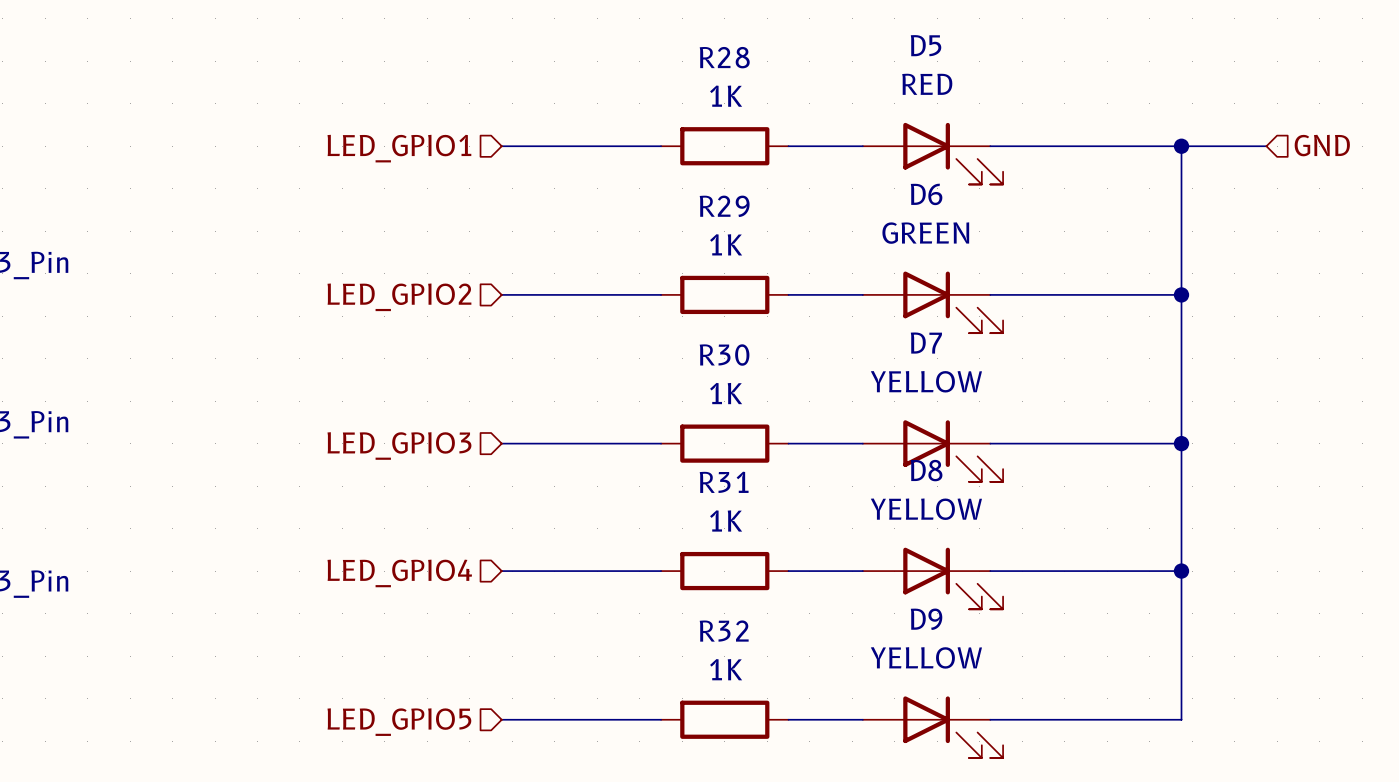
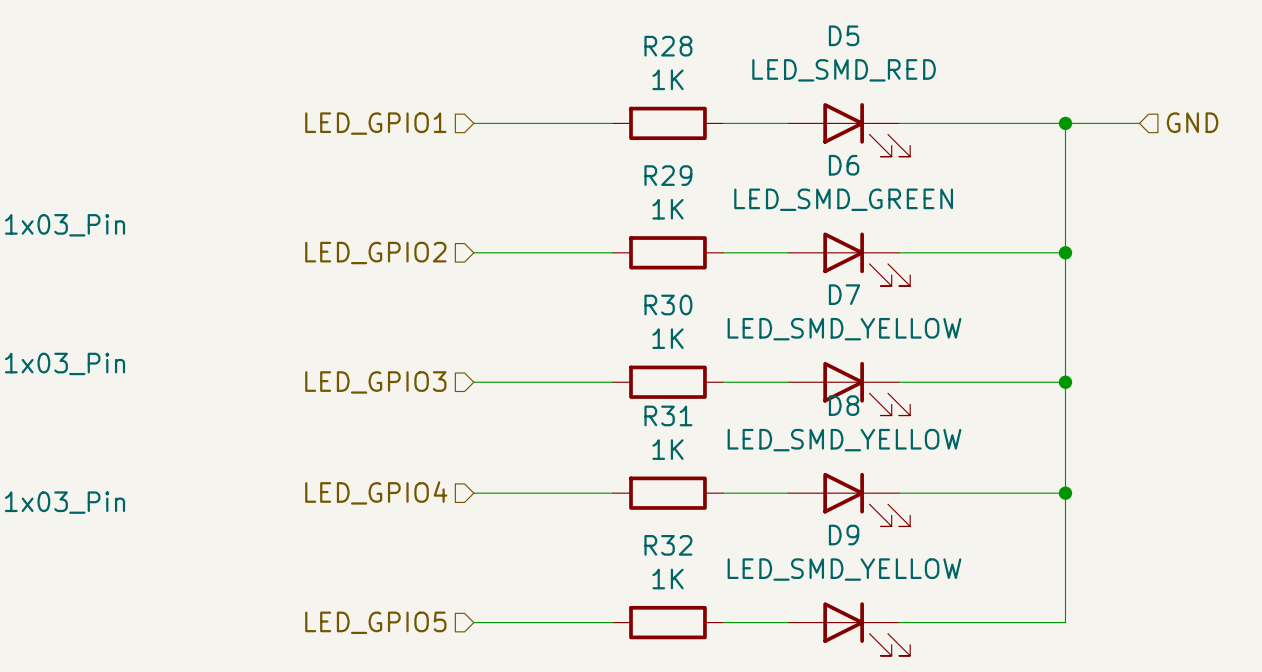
D5 value: RED (927, 84) -> LED_SMD_RED (844, 70)
D6 value: GREEN (925, 233) -> LED_SMD_GREEN (843, 199)
D7 value: YELLOW (926, 381) -> LED_SMD_YELLOW (844, 329)
D8 value: YELLOW (926, 509) -> LED_SMD_YELLOW (844, 440)
D9 value: YELLOW (926, 657) -> LED_SMD_YELLOW (844, 569)

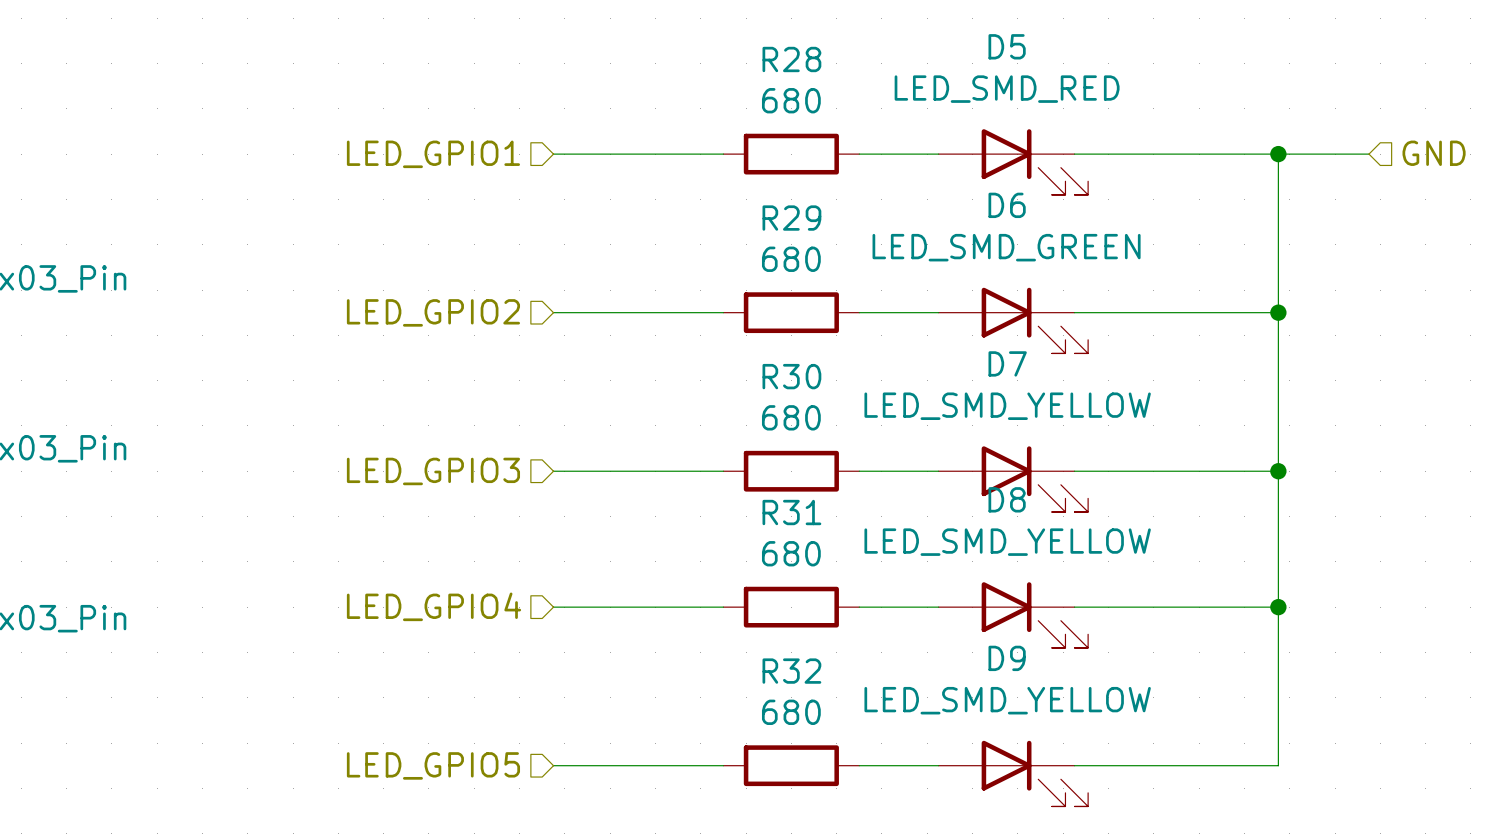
R28 value: 1K (667, 79) -> 680 (791, 100)
R29 value: 1K (667, 209) -> 680 (791, 259)
R30 value: 1K (667, 338) -> 680 (791, 417)
R31 value: 1K (667, 449) -> 680 (791, 553)
R32 value: 1K (667, 579) -> 680 (791, 712)

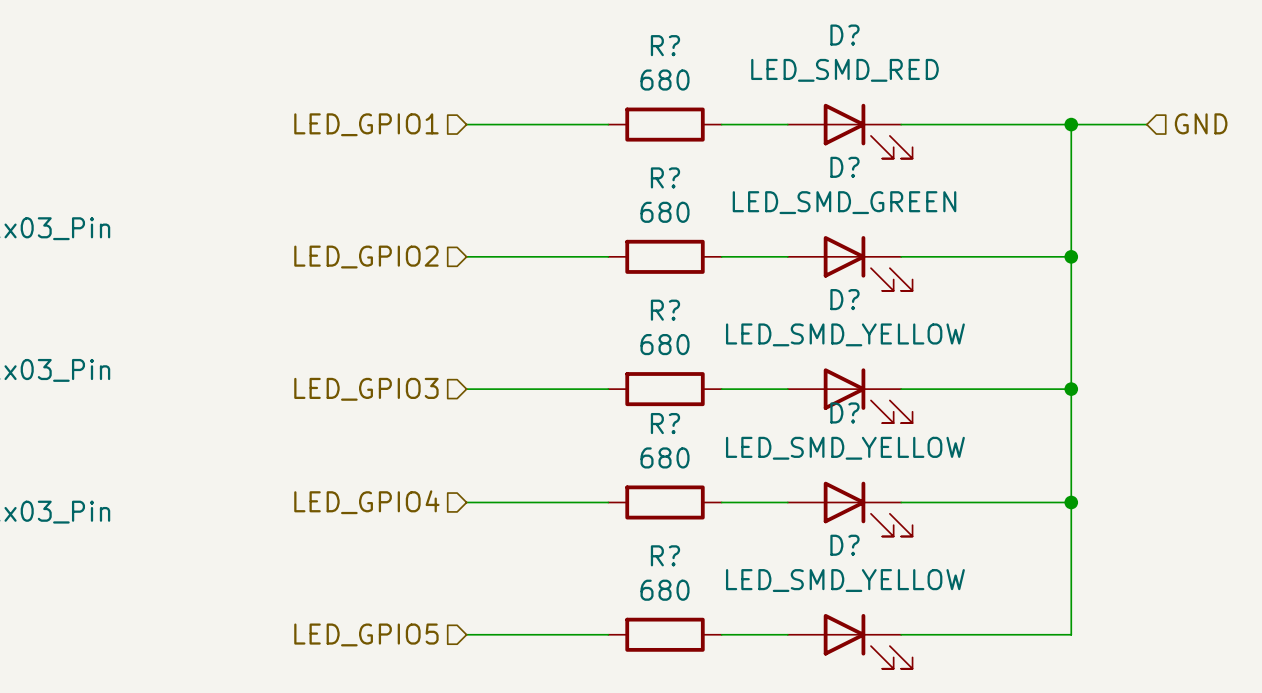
D5 name: D5 (1007, 46) -> D? (844, 35)
R28 name: R28 (791, 59) -> R? (665, 45)
D6 name: D6 (1007, 205) -> D? (844, 167)
R29 name: R29 (791, 218) -> R? (665, 177)
D7 name: D7 (1007, 363) -> D? (844, 299)
R30 name: R30 (791, 376) -> R? (665, 310)
D8 name: D8 (1007, 499) -> D? (844, 412)
R31 name: R31 (791, 512) -> R? (665, 423)
D9 name: D9 (1007, 658) -> D? (844, 545)
R32 name: R32 (791, 671) -> R? (665, 555)

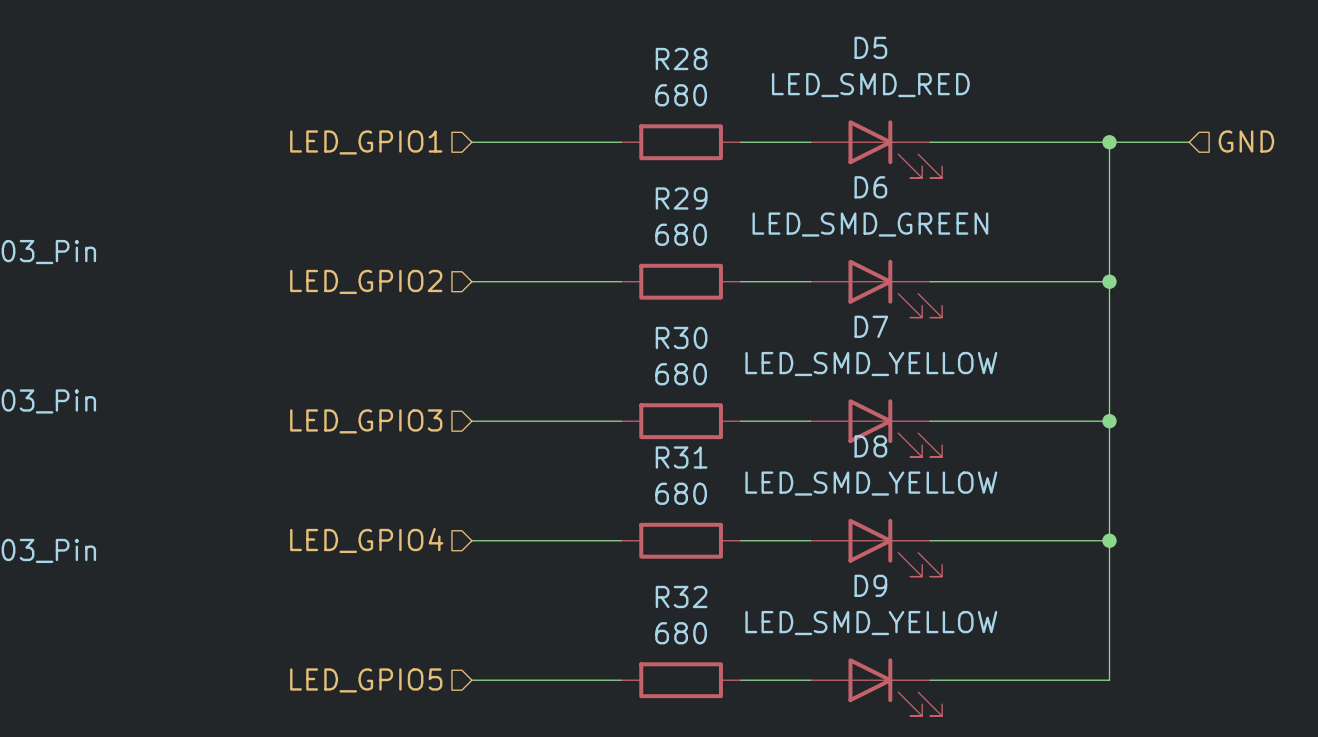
D? name: D? (844, 35) -> D5 (870, 47)
R? name: R? (665, 45) -> R28 (681, 59)
D? name: D? (844, 167) -> D6 (870, 187)
R? name: R? (665, 177) -> R29 (681, 198)
D? name: D? (844, 299) -> D7 (871, 326)
R? name: R? (665, 310) -> R30 (681, 337)
D? name: D? (844, 412) -> D8 (870, 446)
R? name: R? (665, 423) -> R31 (681, 457)
D? name: D? (844, 545) -> D9 (870, 585)
R? name: R? (665, 555) -> R32 (681, 596)

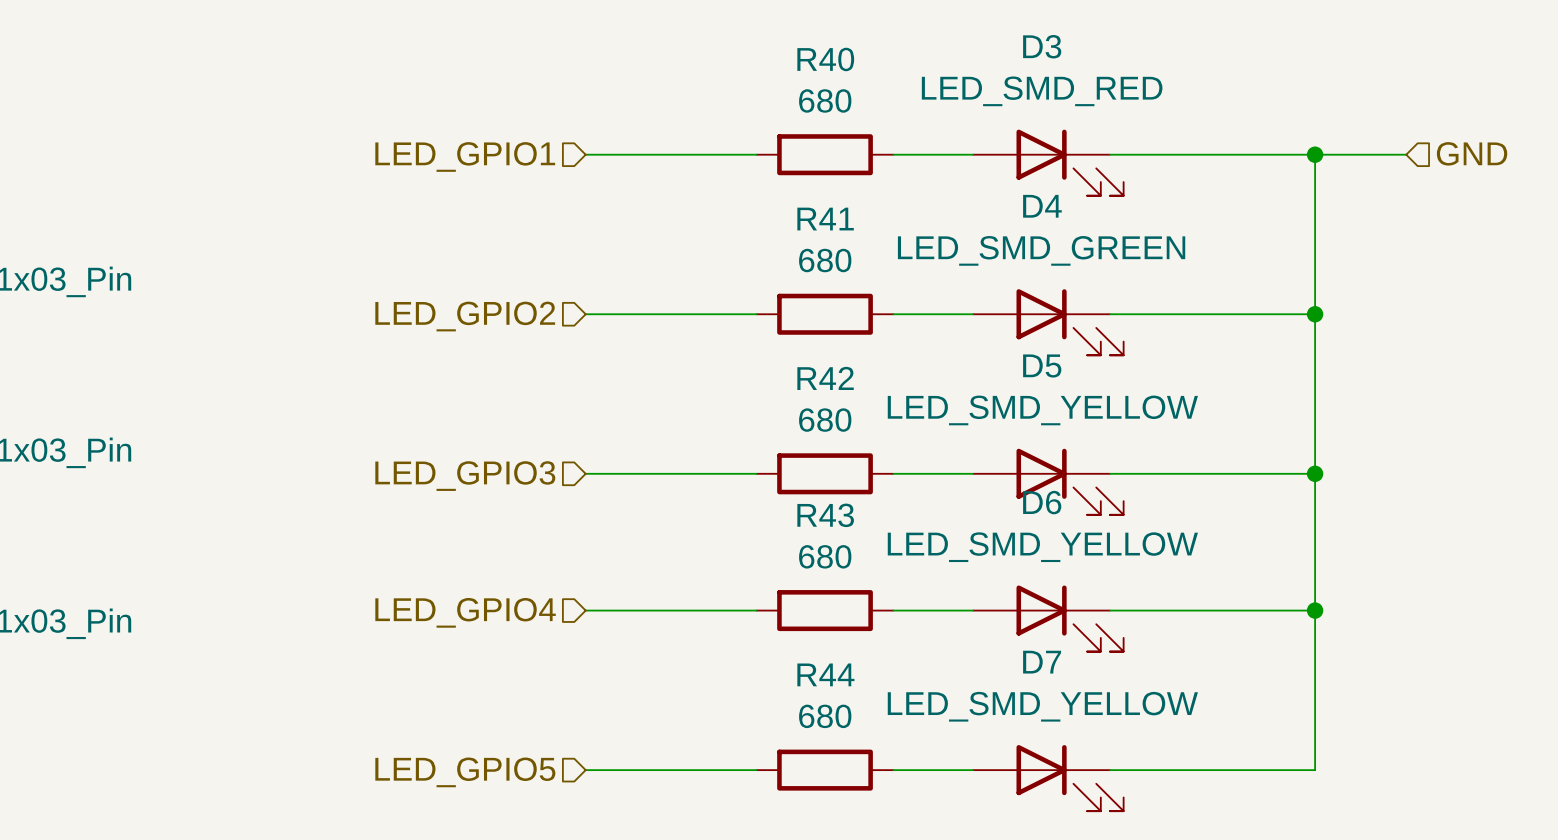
D5 name: D5 (870, 47) -> D3 (1042, 46)
R28 name: R28 (681, 59) -> R40 (825, 59)
D6 name: D6 (870, 187) -> D4 (1042, 206)
R29 name: R29 (681, 198) -> R41 (825, 219)
D7 name: D7 (871, 326) -> D5 (1042, 365)
R30 name: R30 (681, 337) -> R42 (825, 378)
D8 name: D8 (870, 446) -> D6 (1042, 502)
R31 name: R31 (681, 457) -> R43 (825, 515)
D9 name: D9 (870, 585) -> D7 (1042, 662)
R32 name: R32 (681, 596) -> R44 (825, 674)

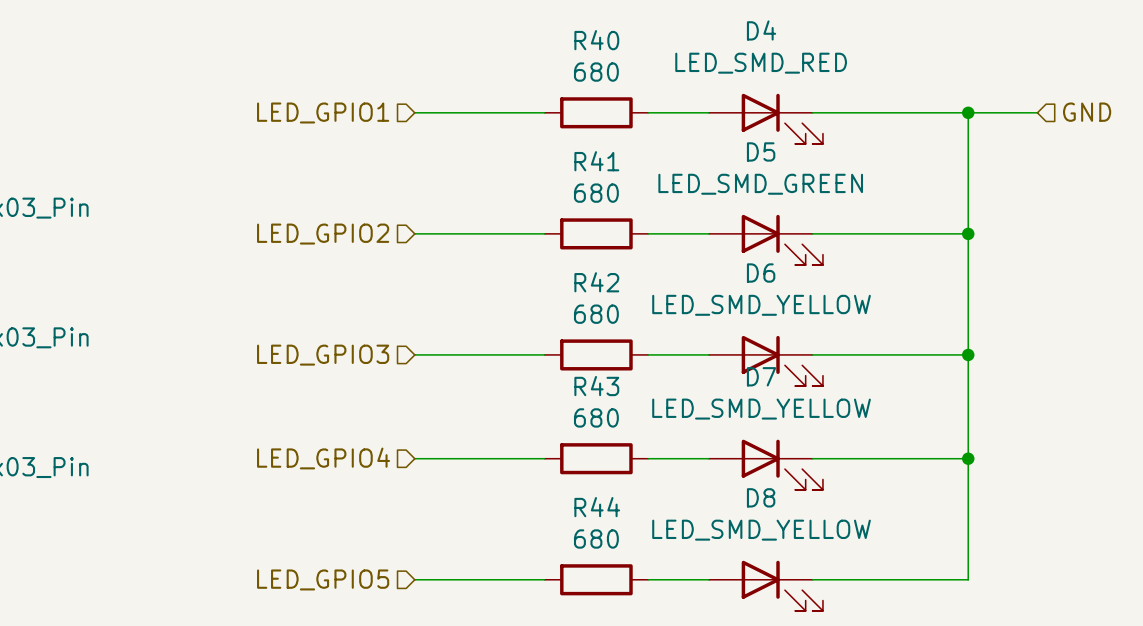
D3 name: D3 (1042, 46) -> D4 (761, 30)
D4 name: D4 (1042, 206) -> D5 (761, 151)
D5 name: D5 (1042, 365) -> D6 (761, 273)
D6 name: D6 (1042, 502) -> D7 (761, 376)
D7 name: D7 (1042, 662) -> D8 (761, 497)

